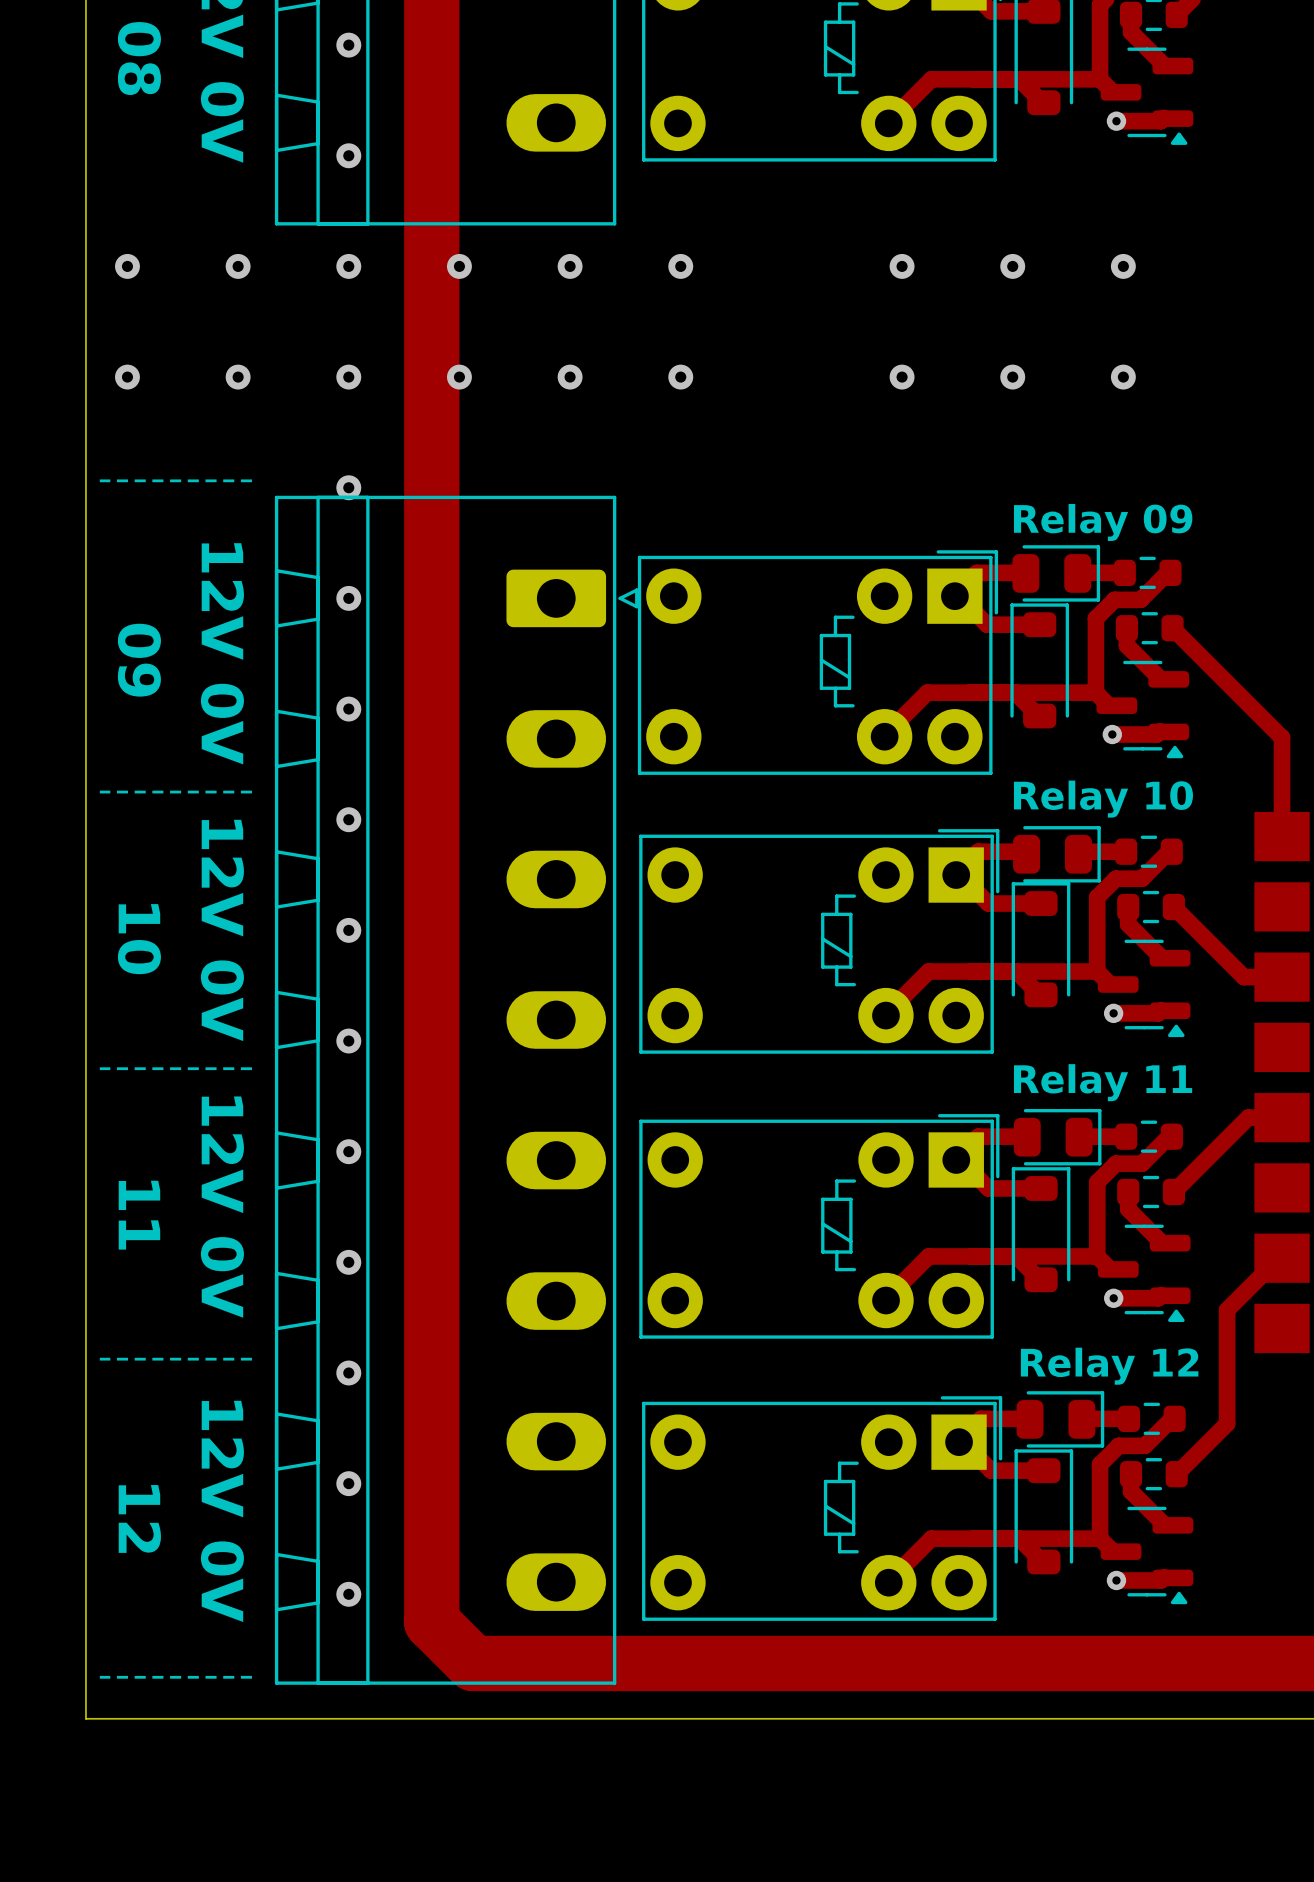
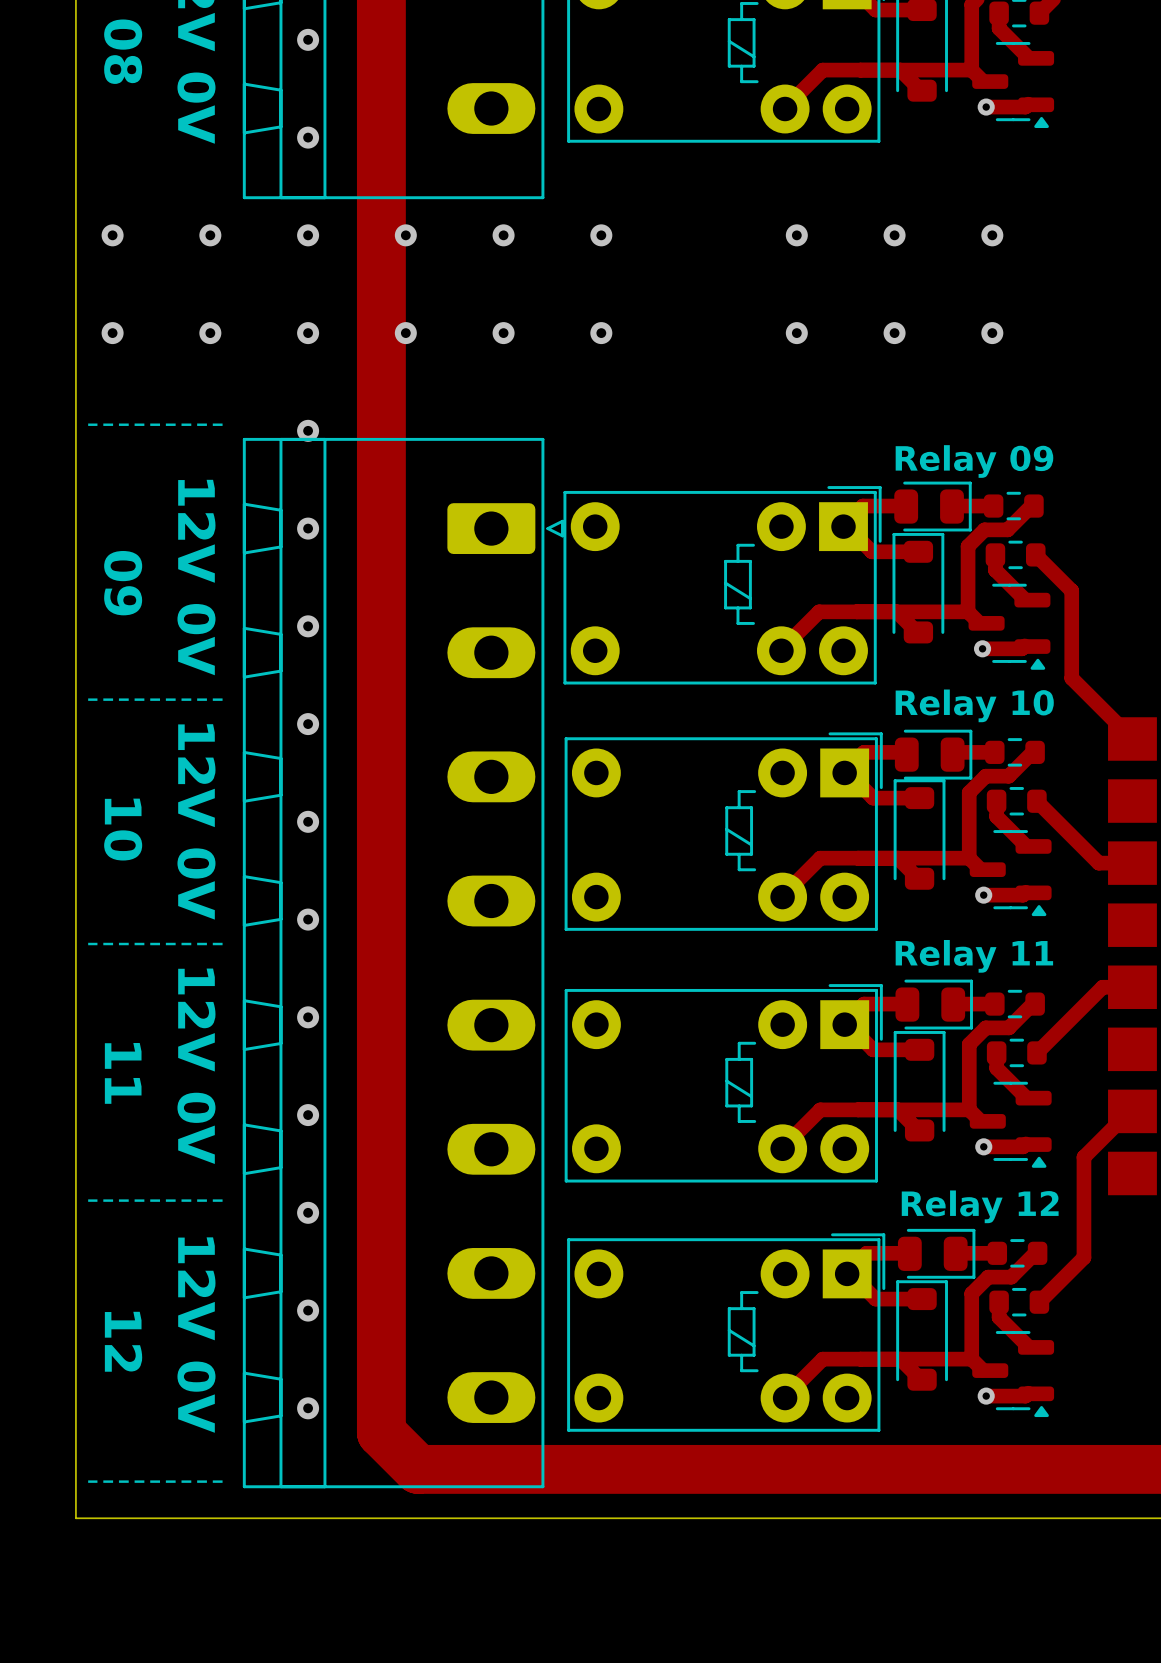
track: (1213, 668) (1282, 737) (1282, 836) -> (1071, 590) (1071, 678) (1132, 738)

